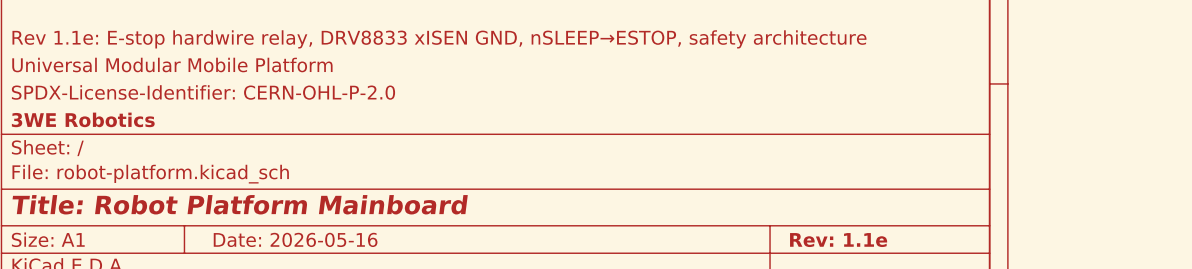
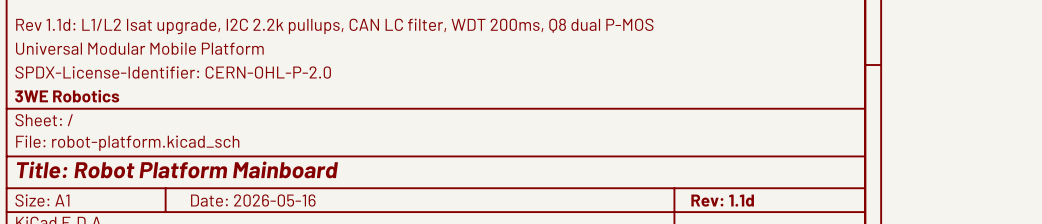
title block: Rev 1.1e: E-stop hardwire relay, DRV8833 xISEN GND, nSLEEP→ESTOP, safety architecture (439, 39) -> Rev 1.1d: L1/L2 Isat upgrade, I2C 2.2k pullups, CAN LC filter, WDT 200ms, Q8 dual P-MOS (334, 26)
title block: Rev: 1.1e (838, 240) -> Rev: 1.1d (722, 200)

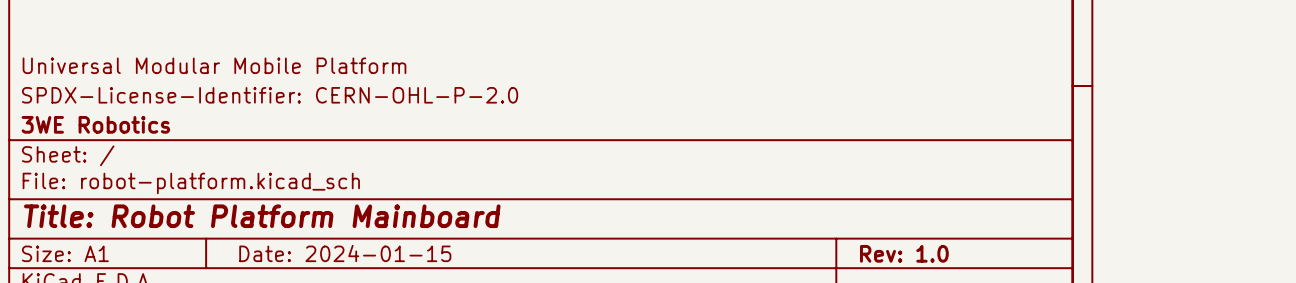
title block: Rev 1.1d: L1/L2 Isat upgrade, I2C 2.2k pullups, CAN LC filter, WDT 200ms, Q8 dual P-MOS (334, 26) -> none
title block: Date: 2026-05-16 (253, 200) -> Date: 2024-01-15 (345, 253)
title block: Rev: 1.1d (722, 200) -> Rev: 1.0 (904, 253)

